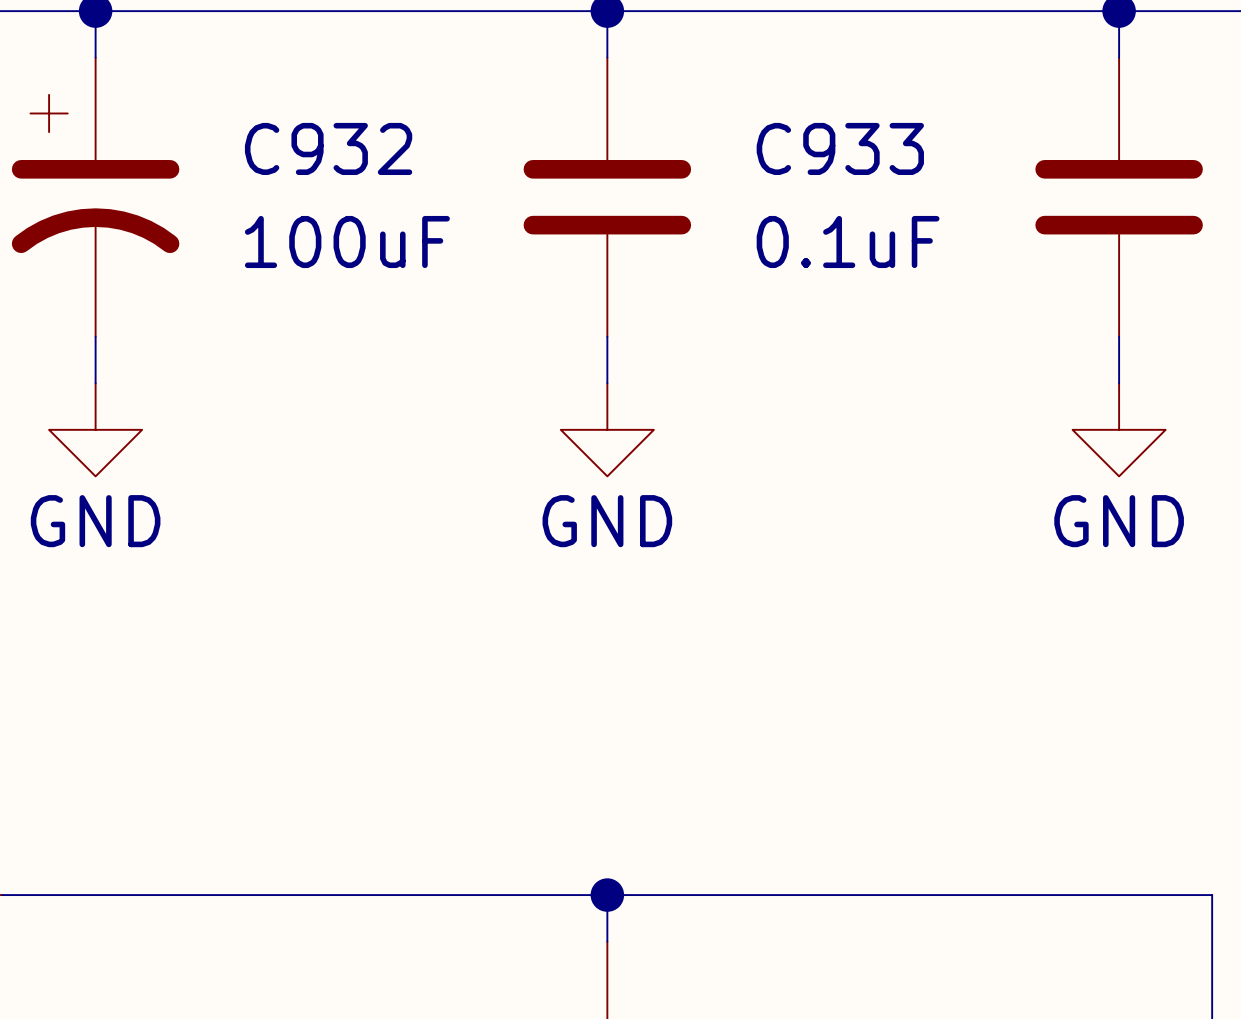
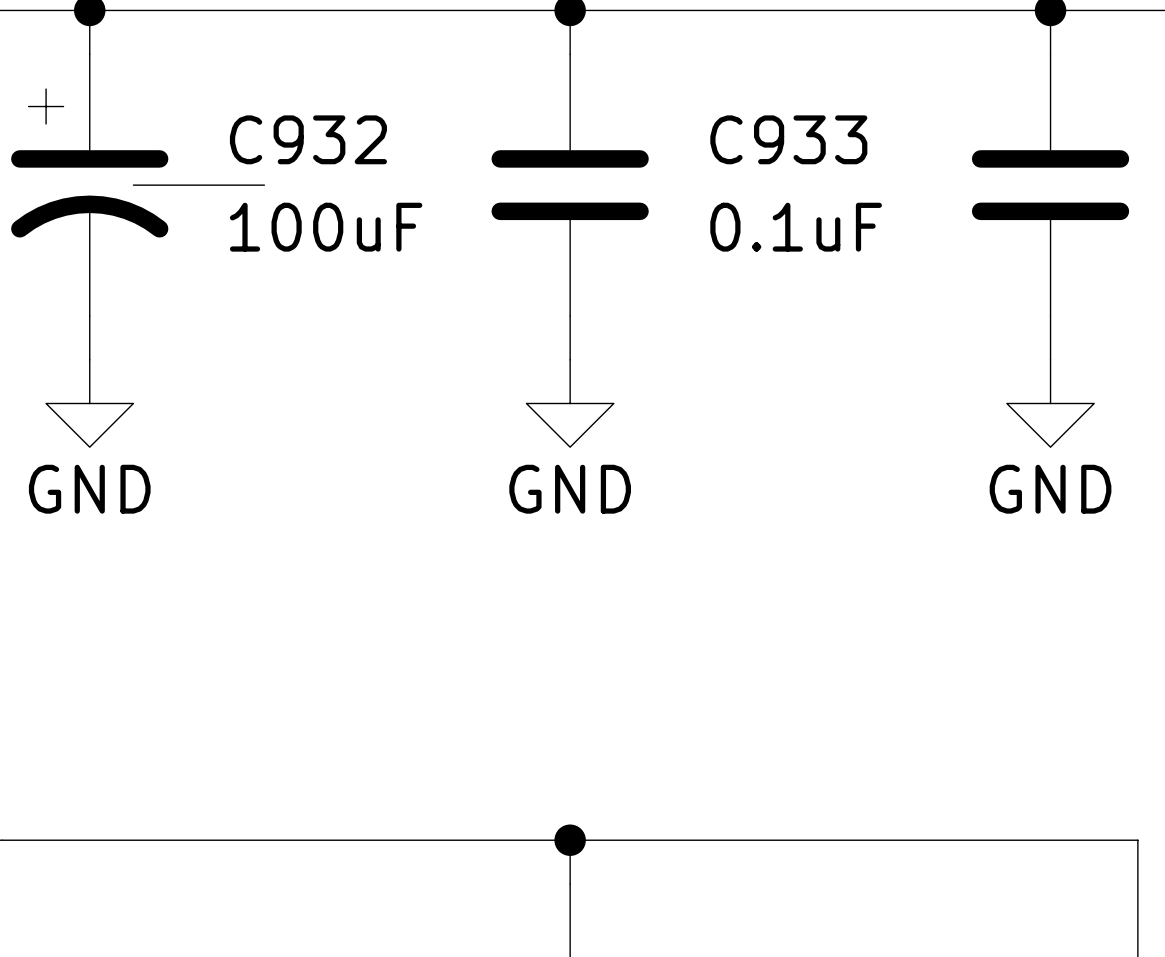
wire: none -> (133, 185) (264, 185)

